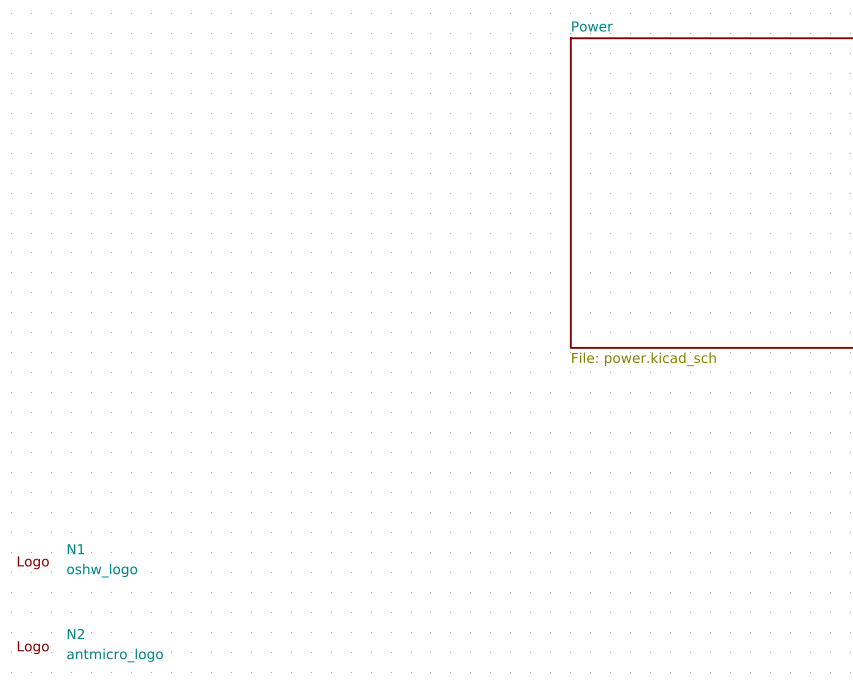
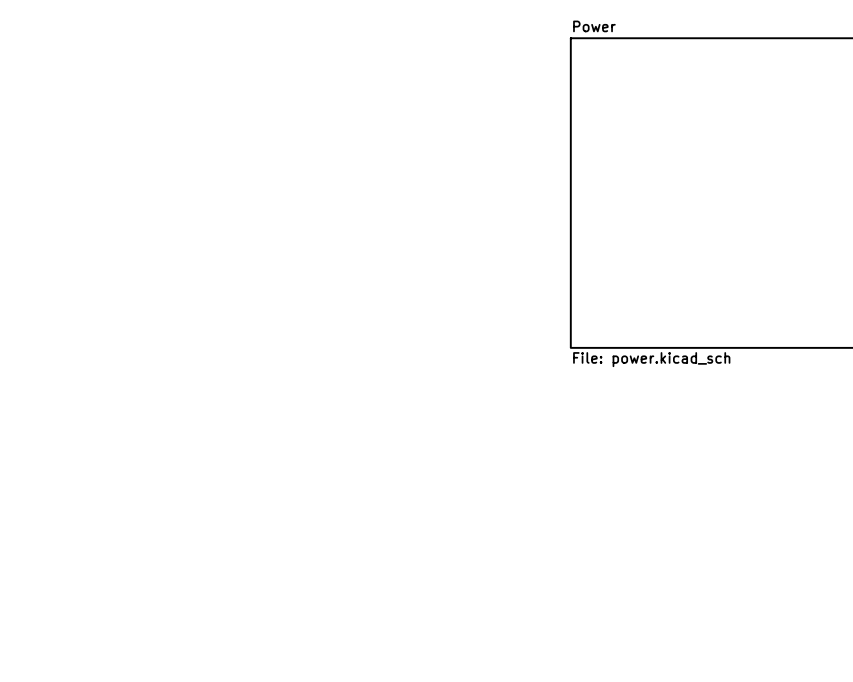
N1: oshw_logo (77, 560) -> none
N2: antmicro_logo (90, 645) -> none

